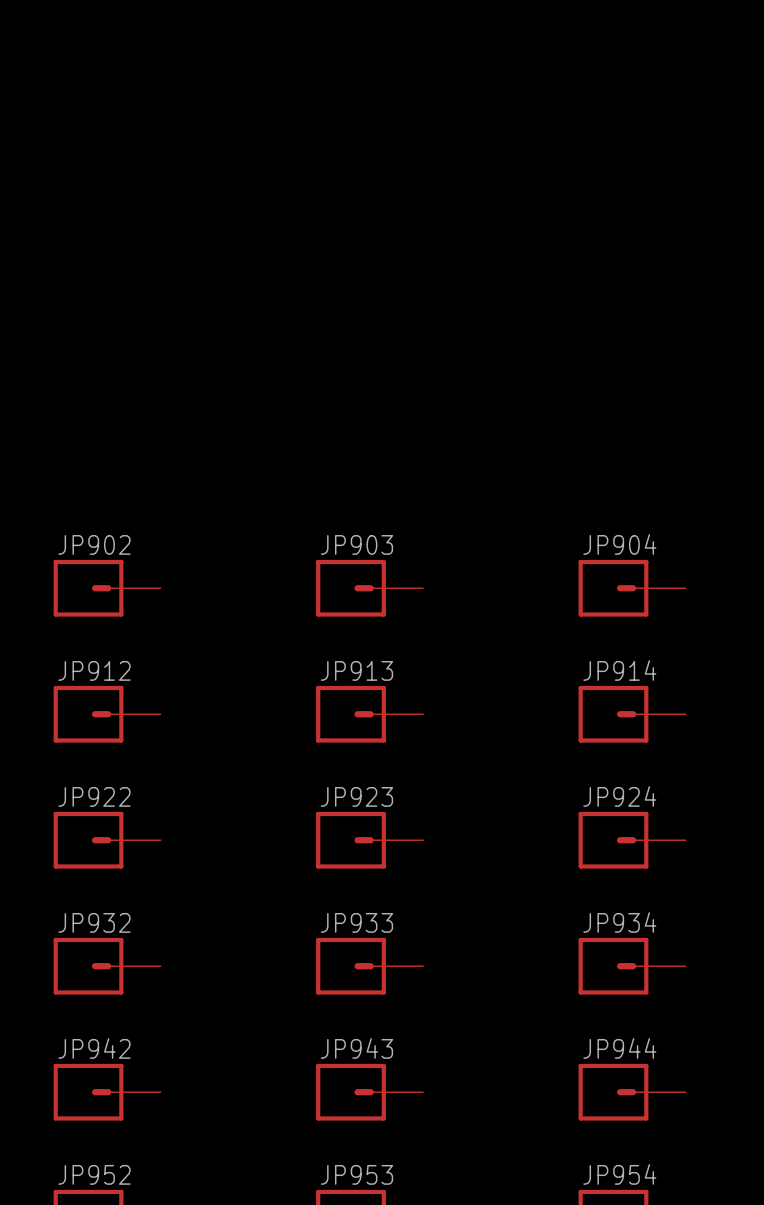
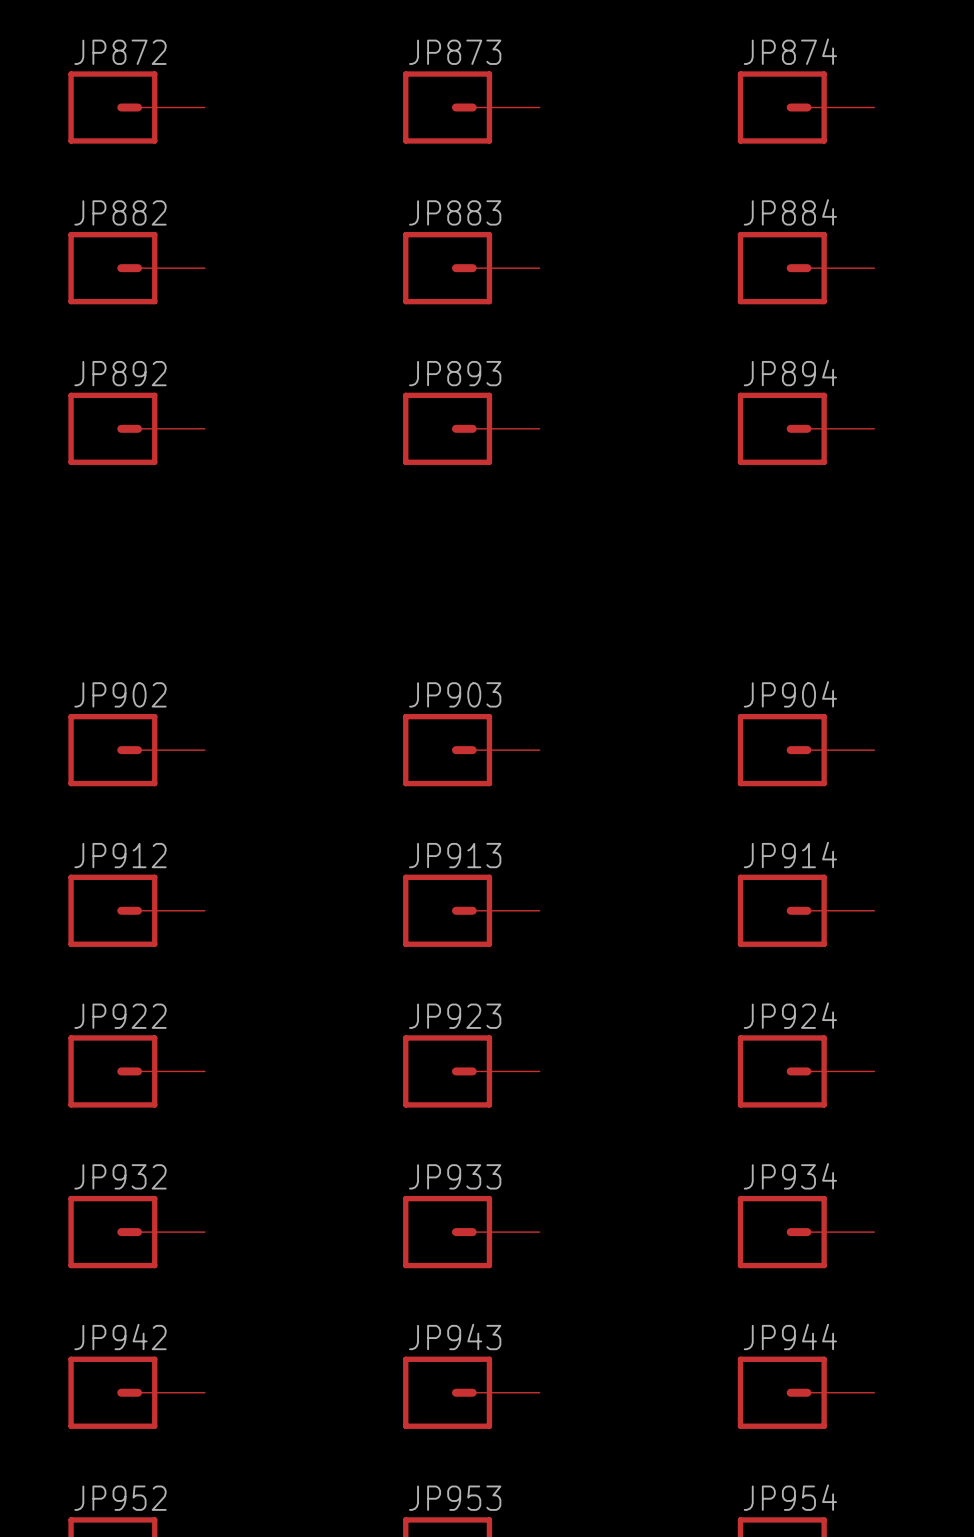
JP872: none -> (136, 107)
JP873: none -> (471, 107)
JP874: none -> (806, 107)
JP882: none -> (136, 268)
JP883: none -> (471, 268)
JP884: none -> (806, 268)
JP892: none -> (136, 428)
JP893: none -> (471, 428)
JP894: none -> (806, 428)

